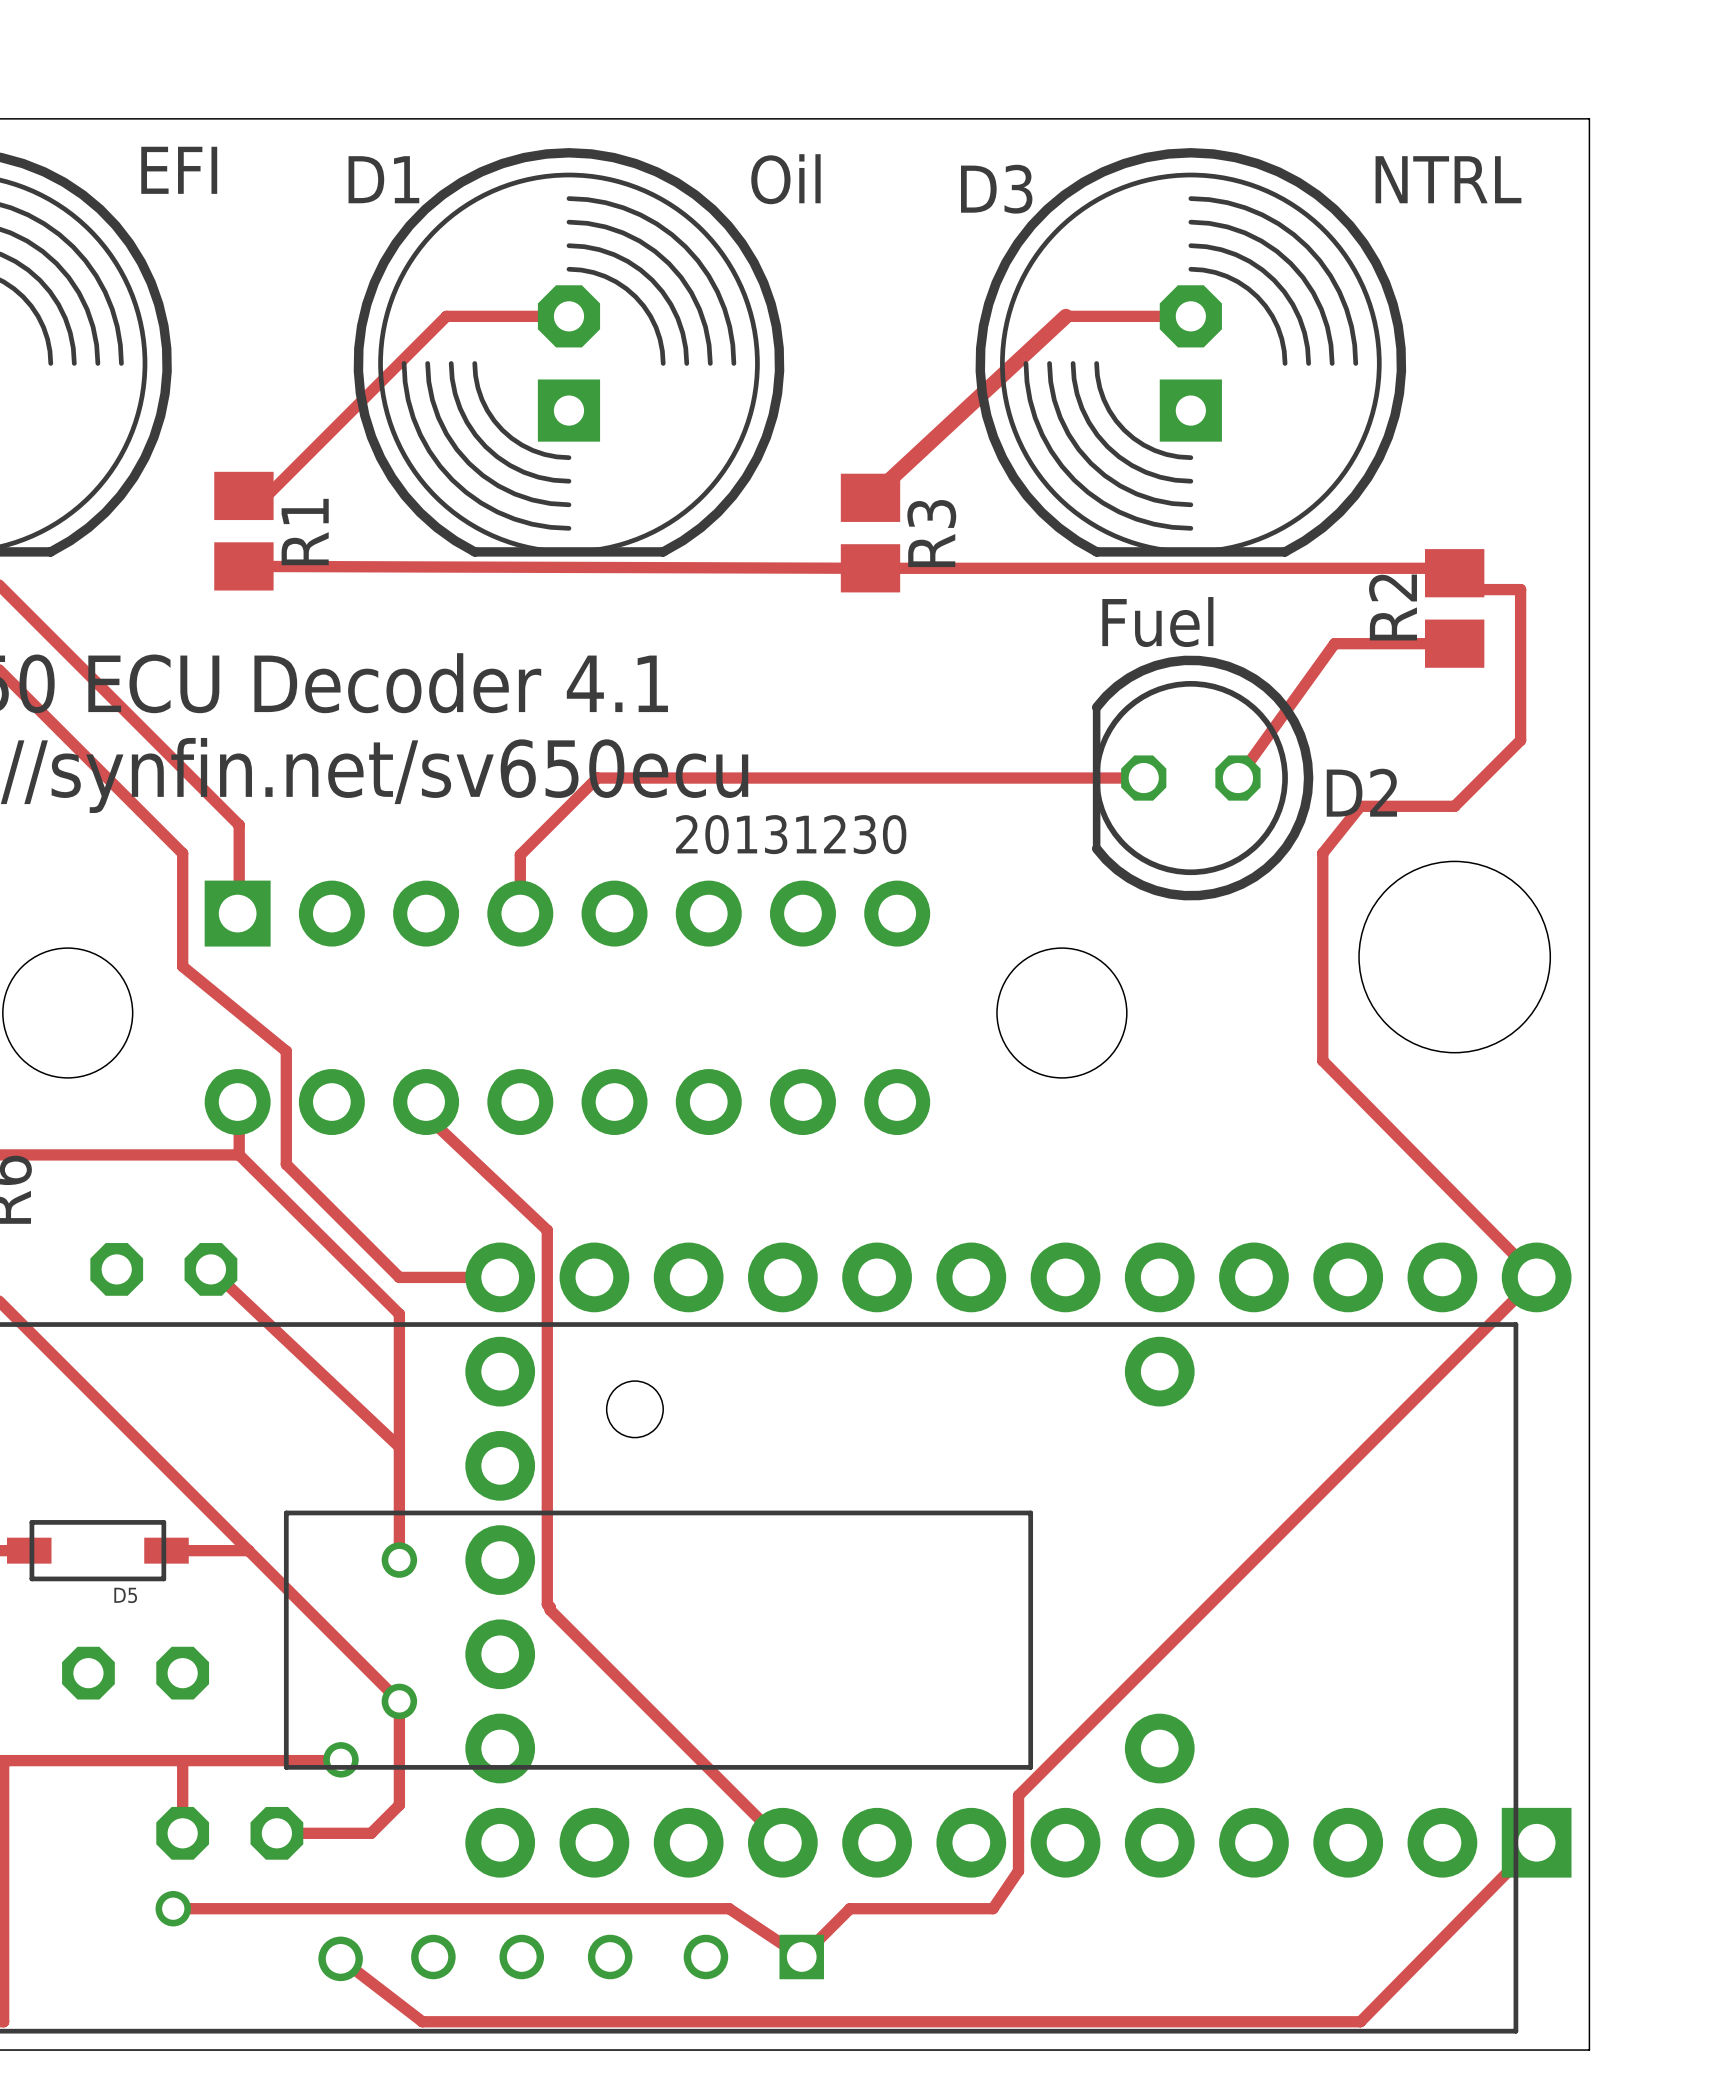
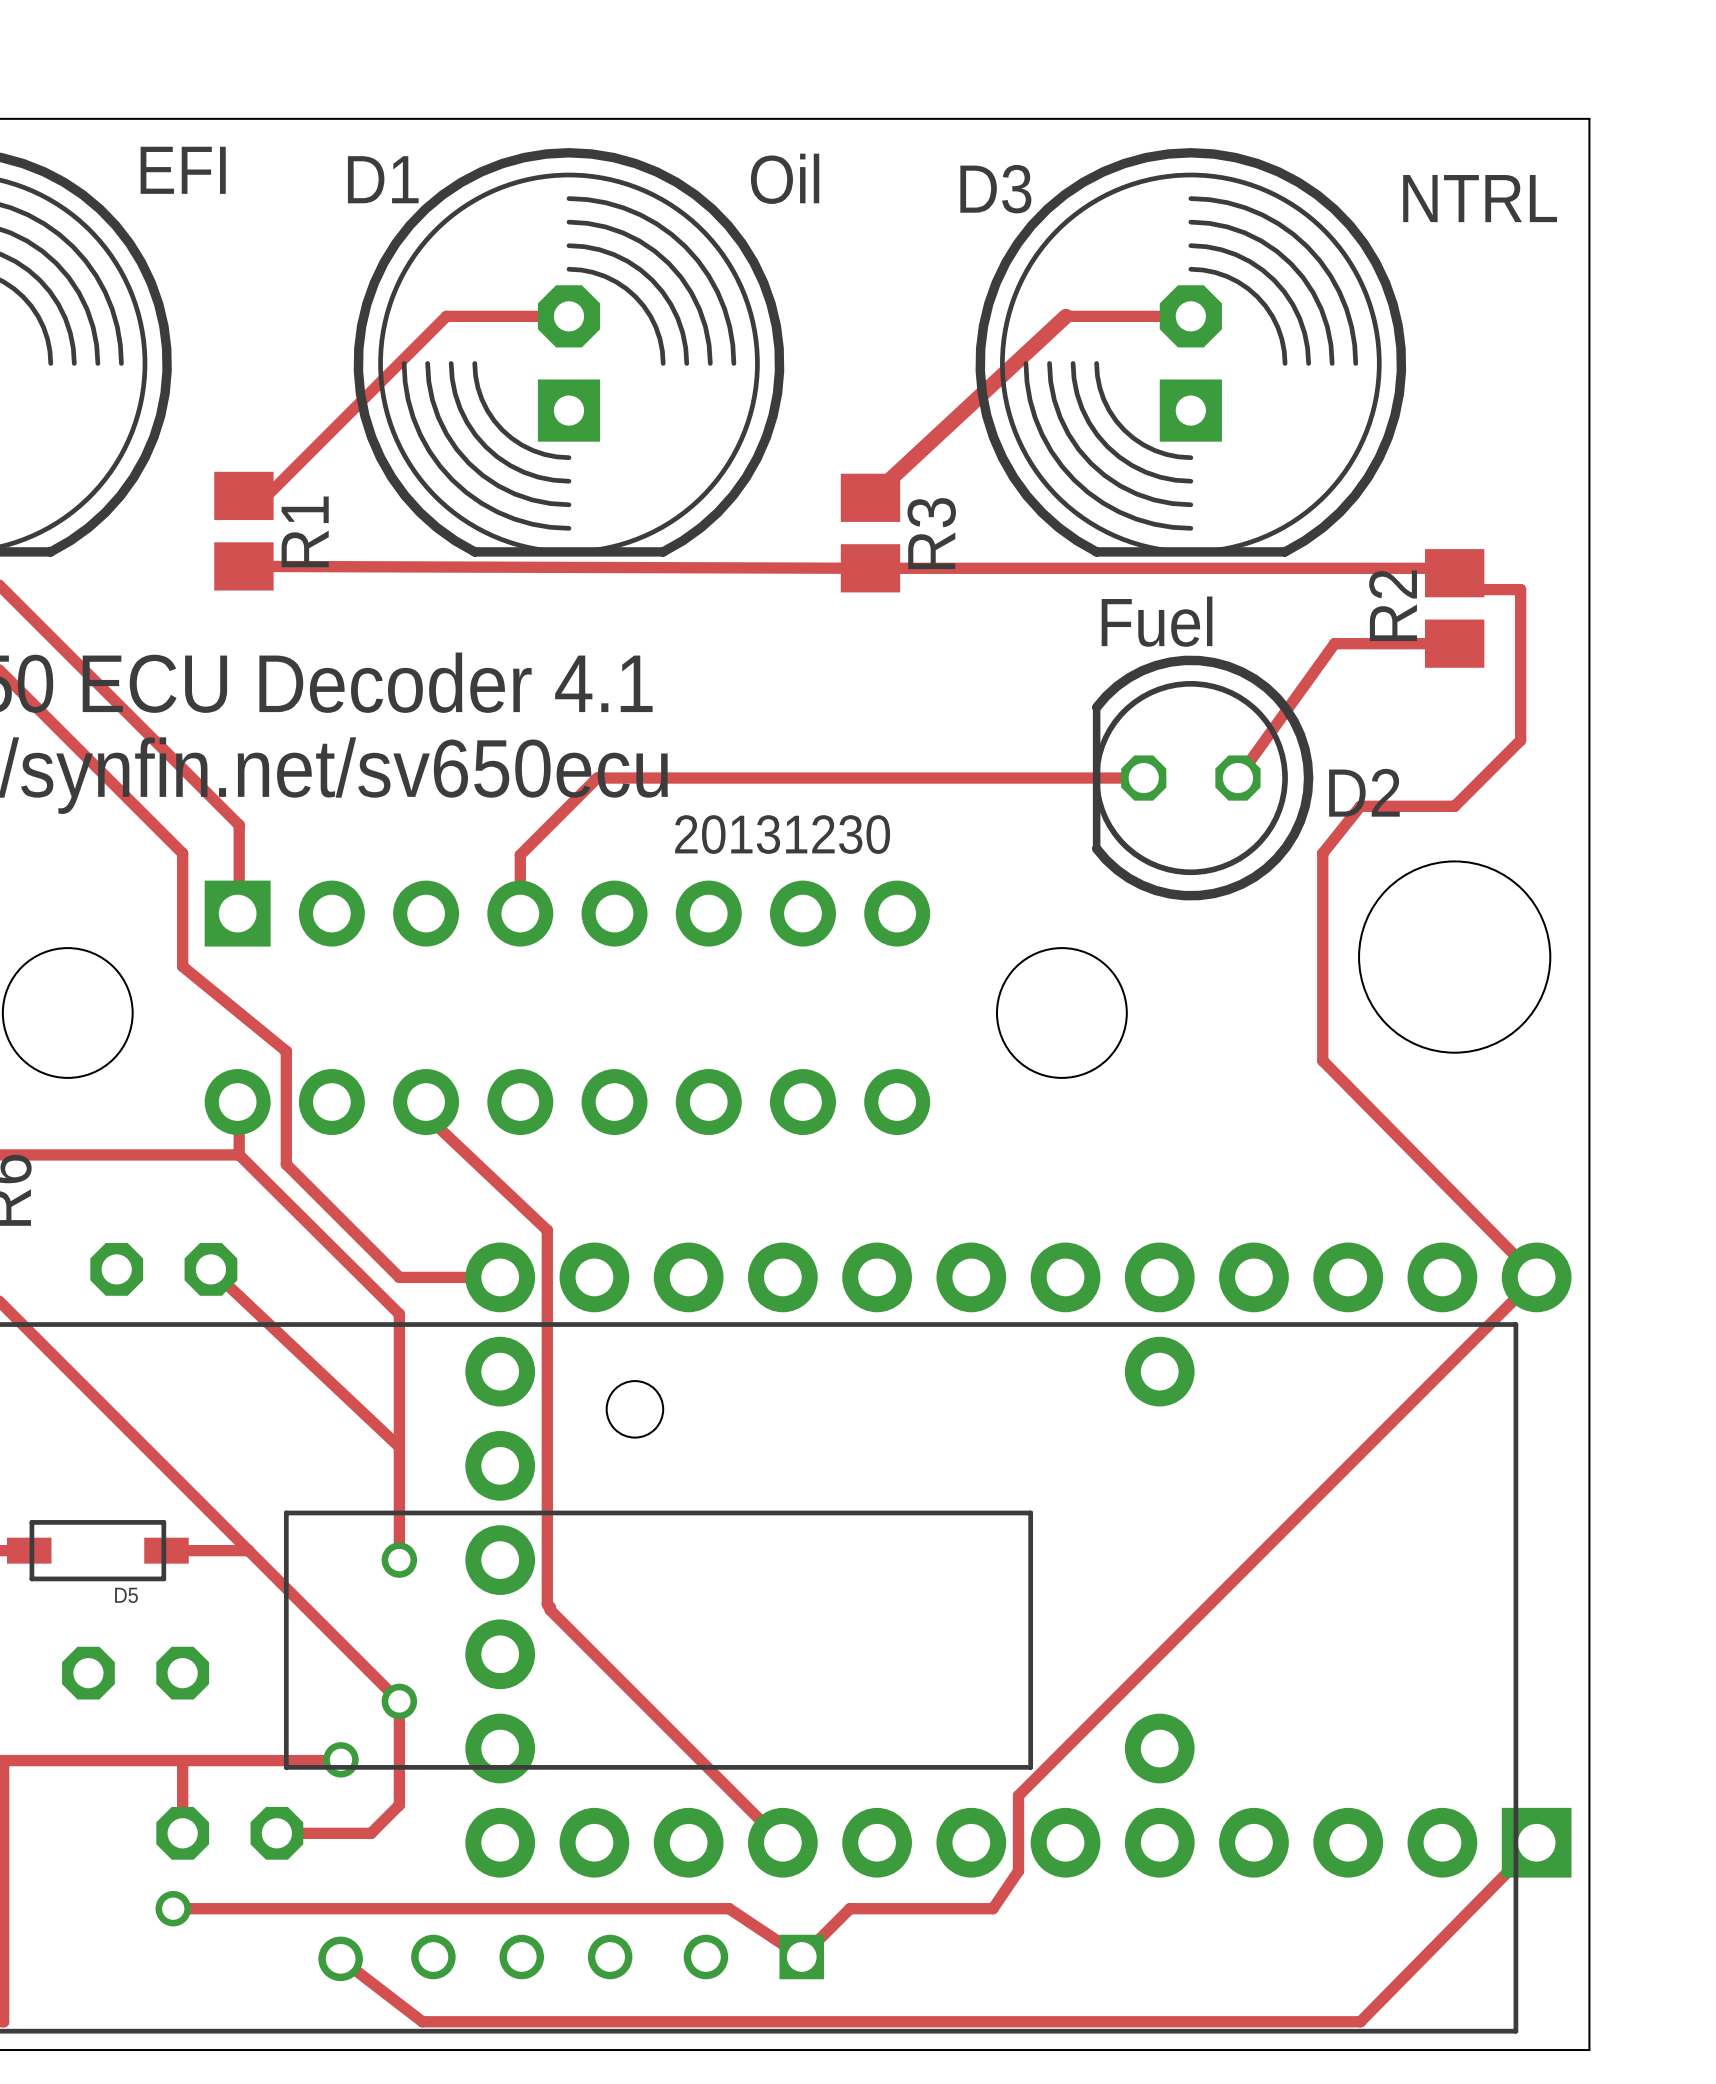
text position: NTRL (1448, 179) -> NTRL (1480, 198)

